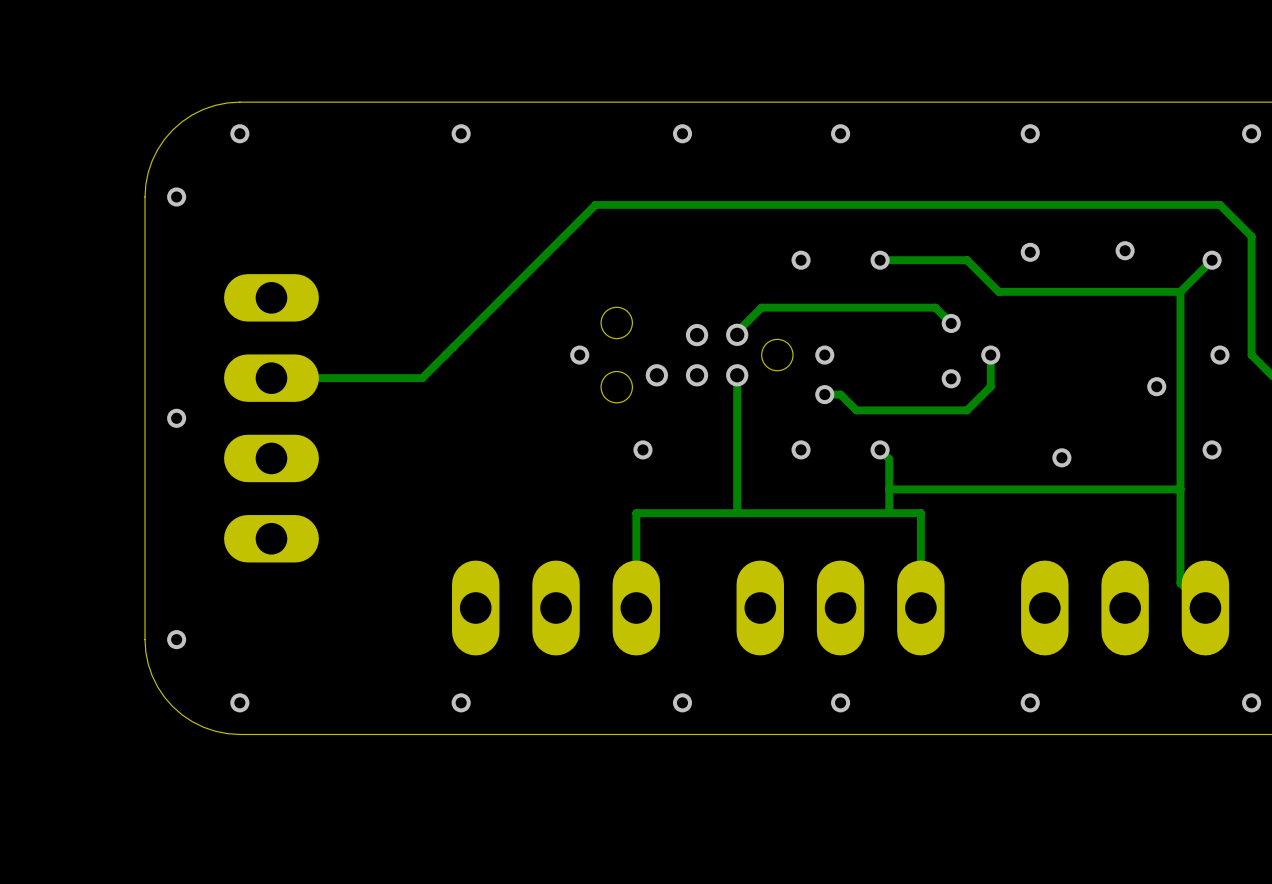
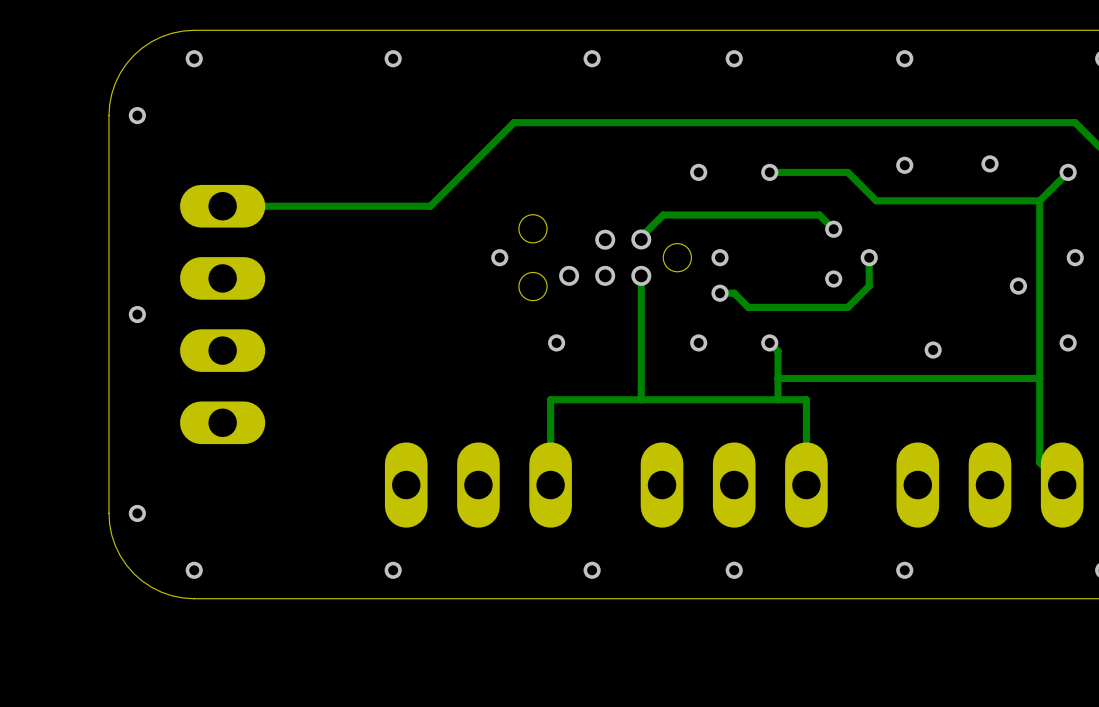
track: (502, 297) (422, 378) (271, 378) -> (430, 206) (222, 206)

